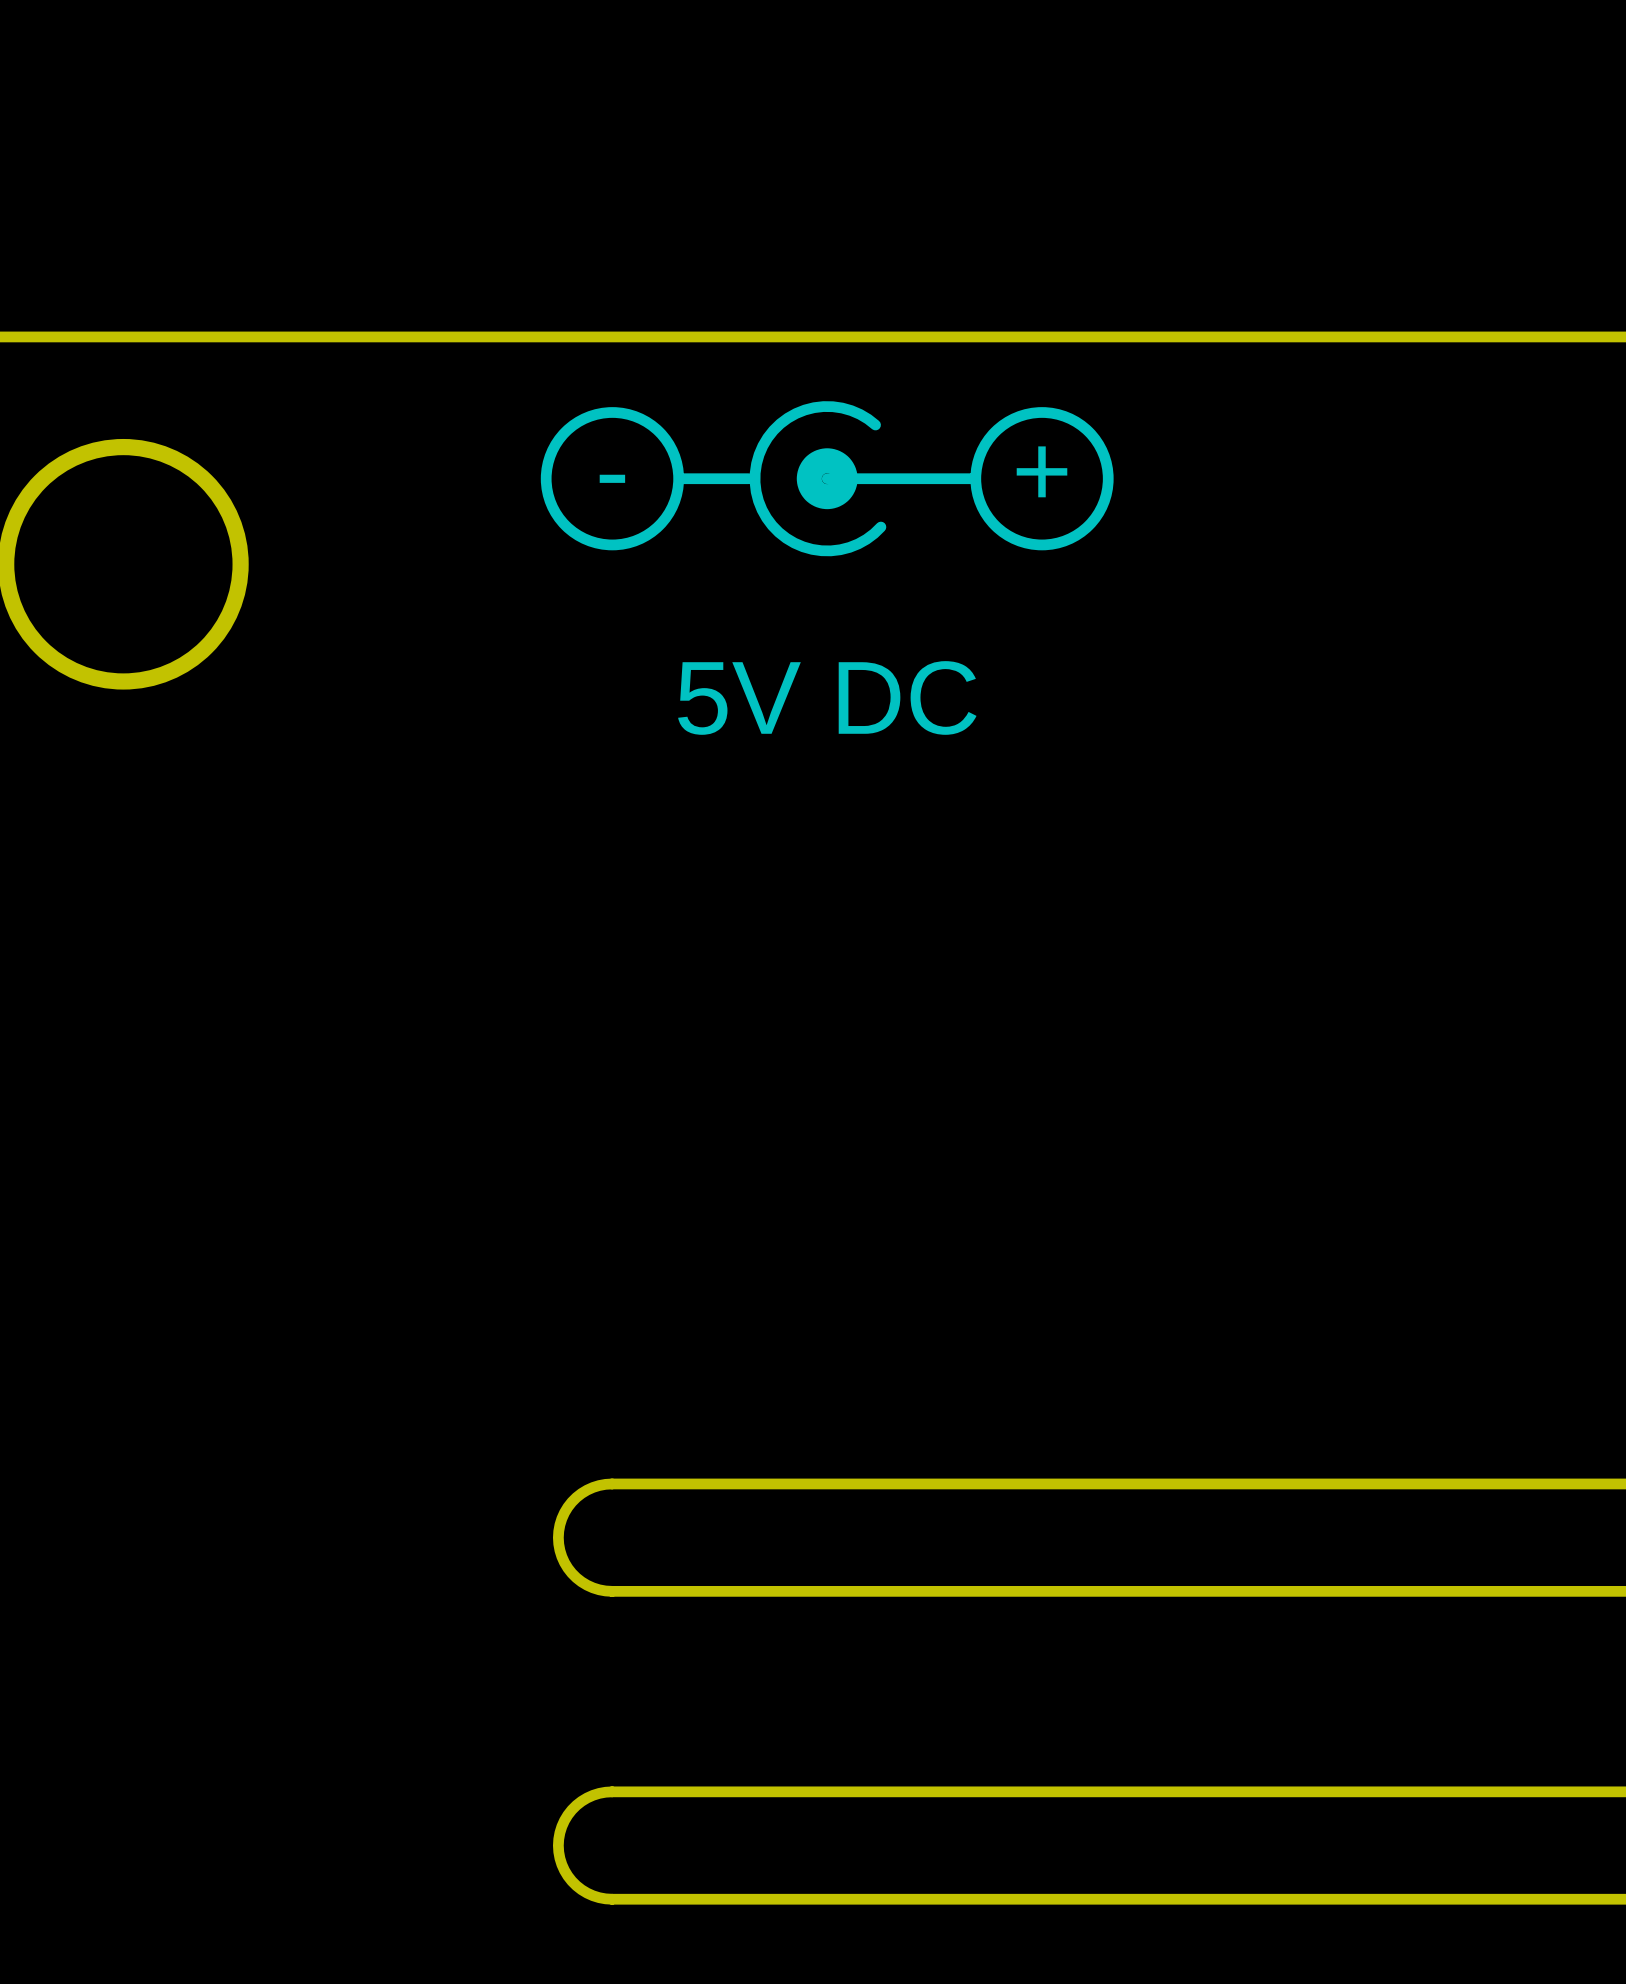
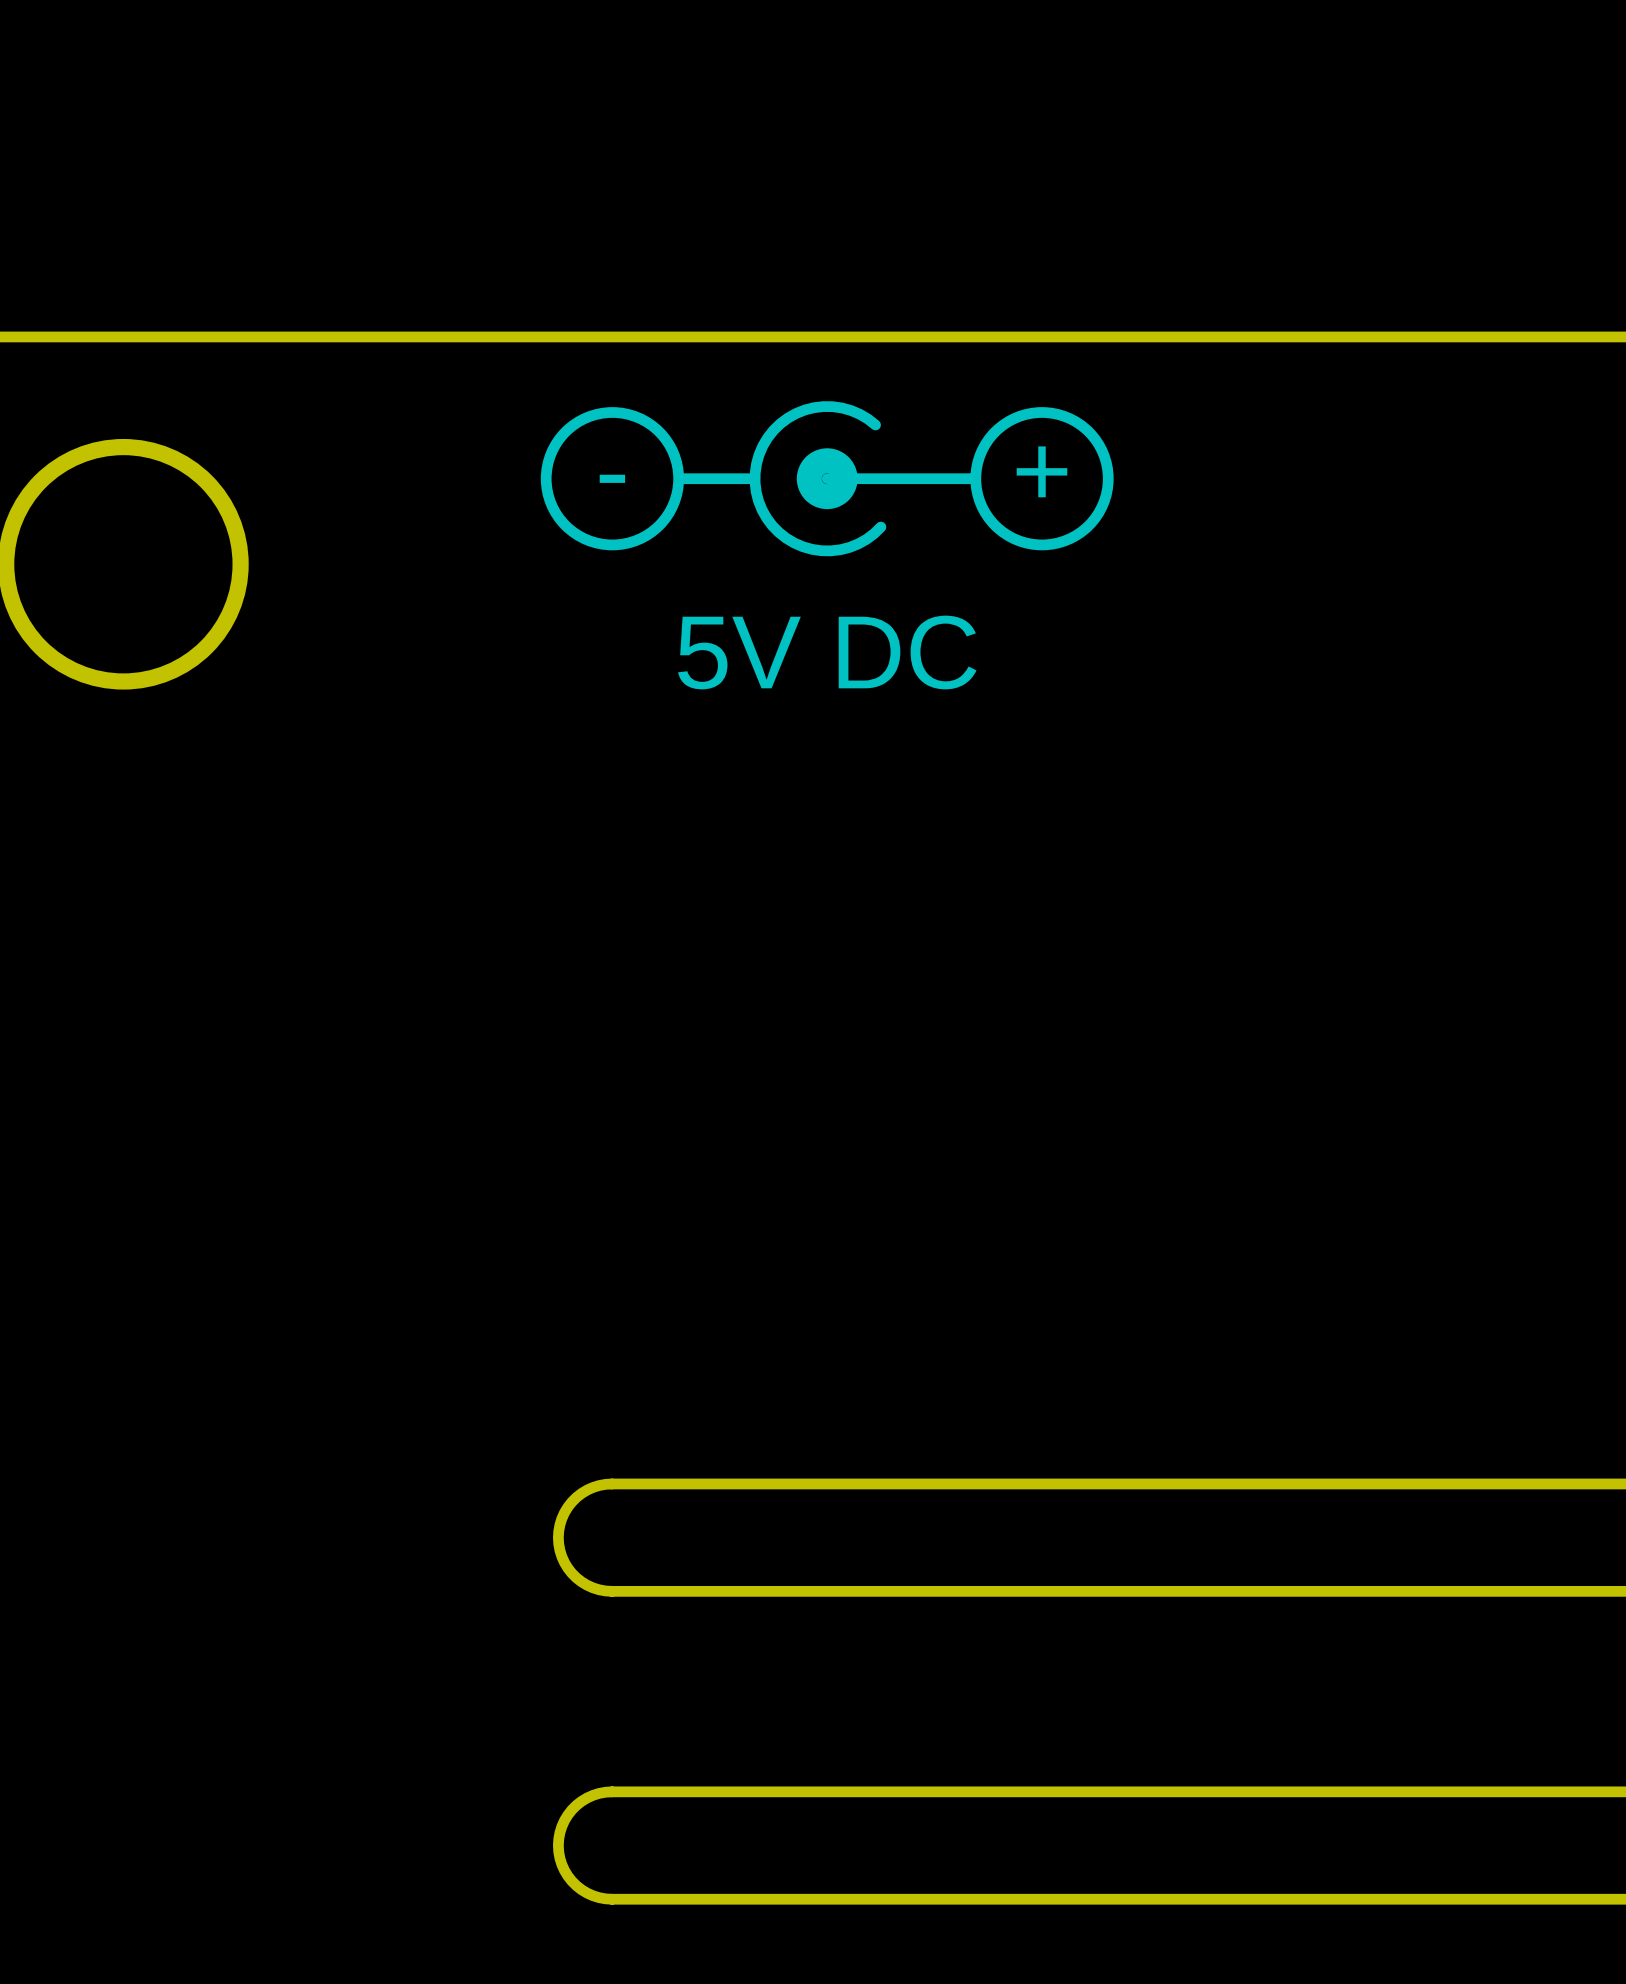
text position: 5V DC (827, 697) -> 5V DC (827, 652)

